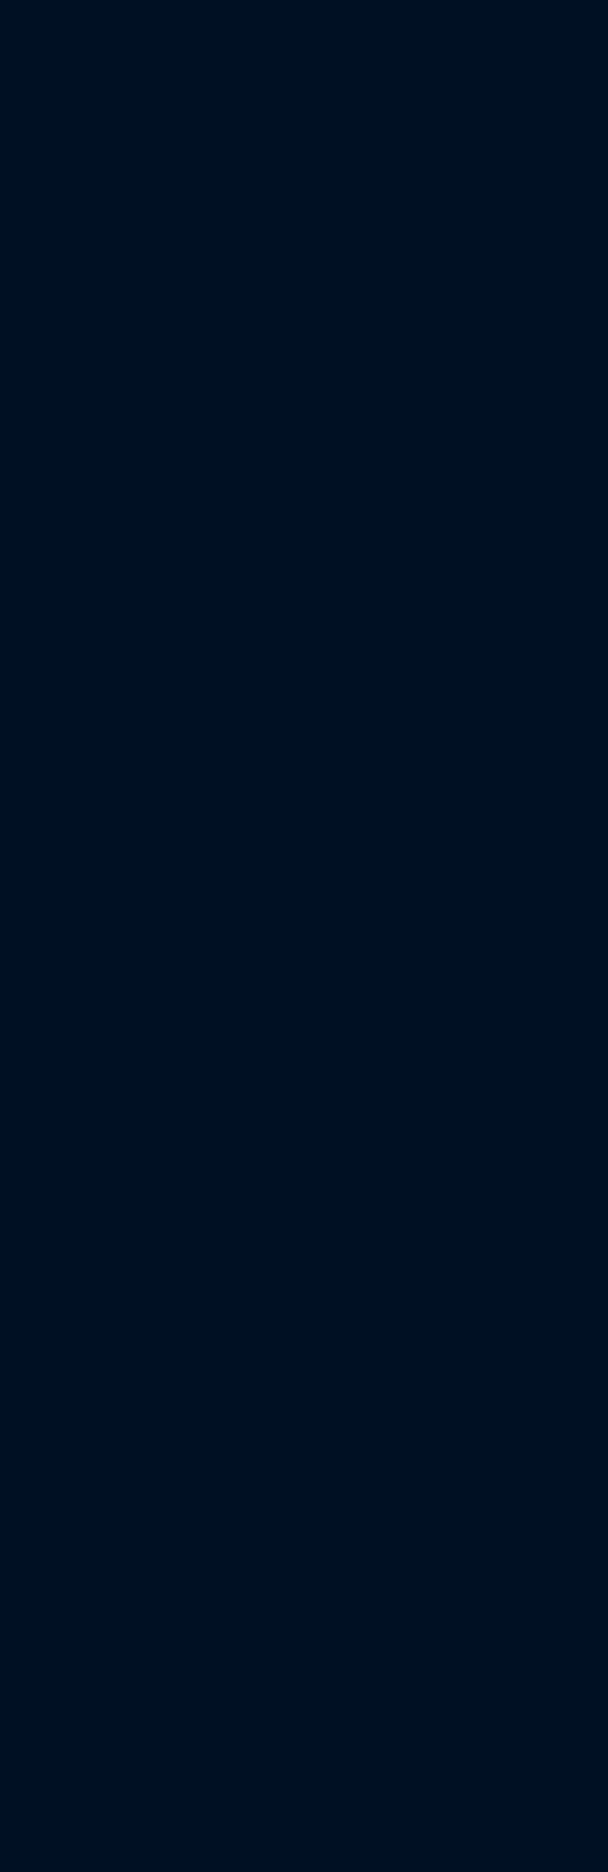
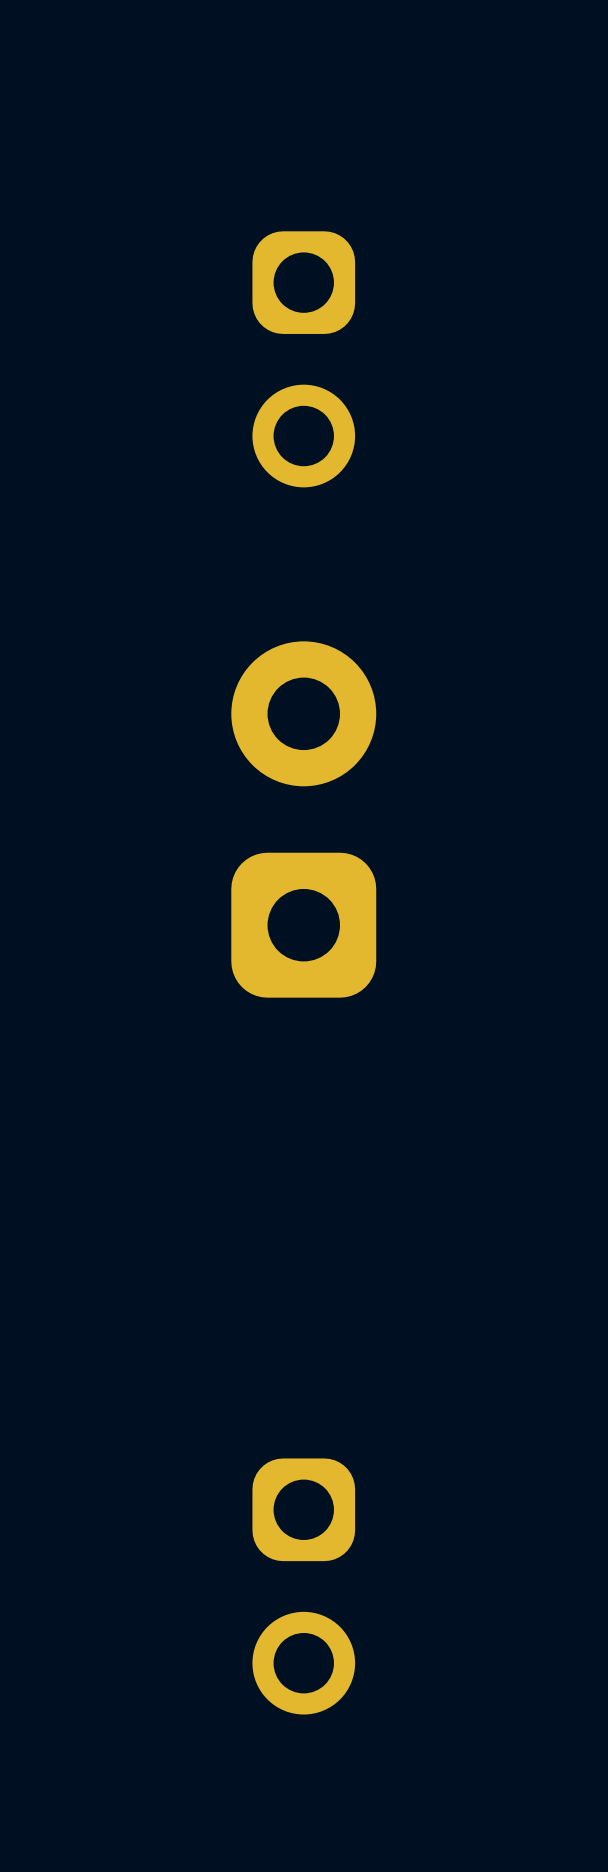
part: none -> (303, 359)
part: none -> (303, 819)
part: none -> (303, 1586)

